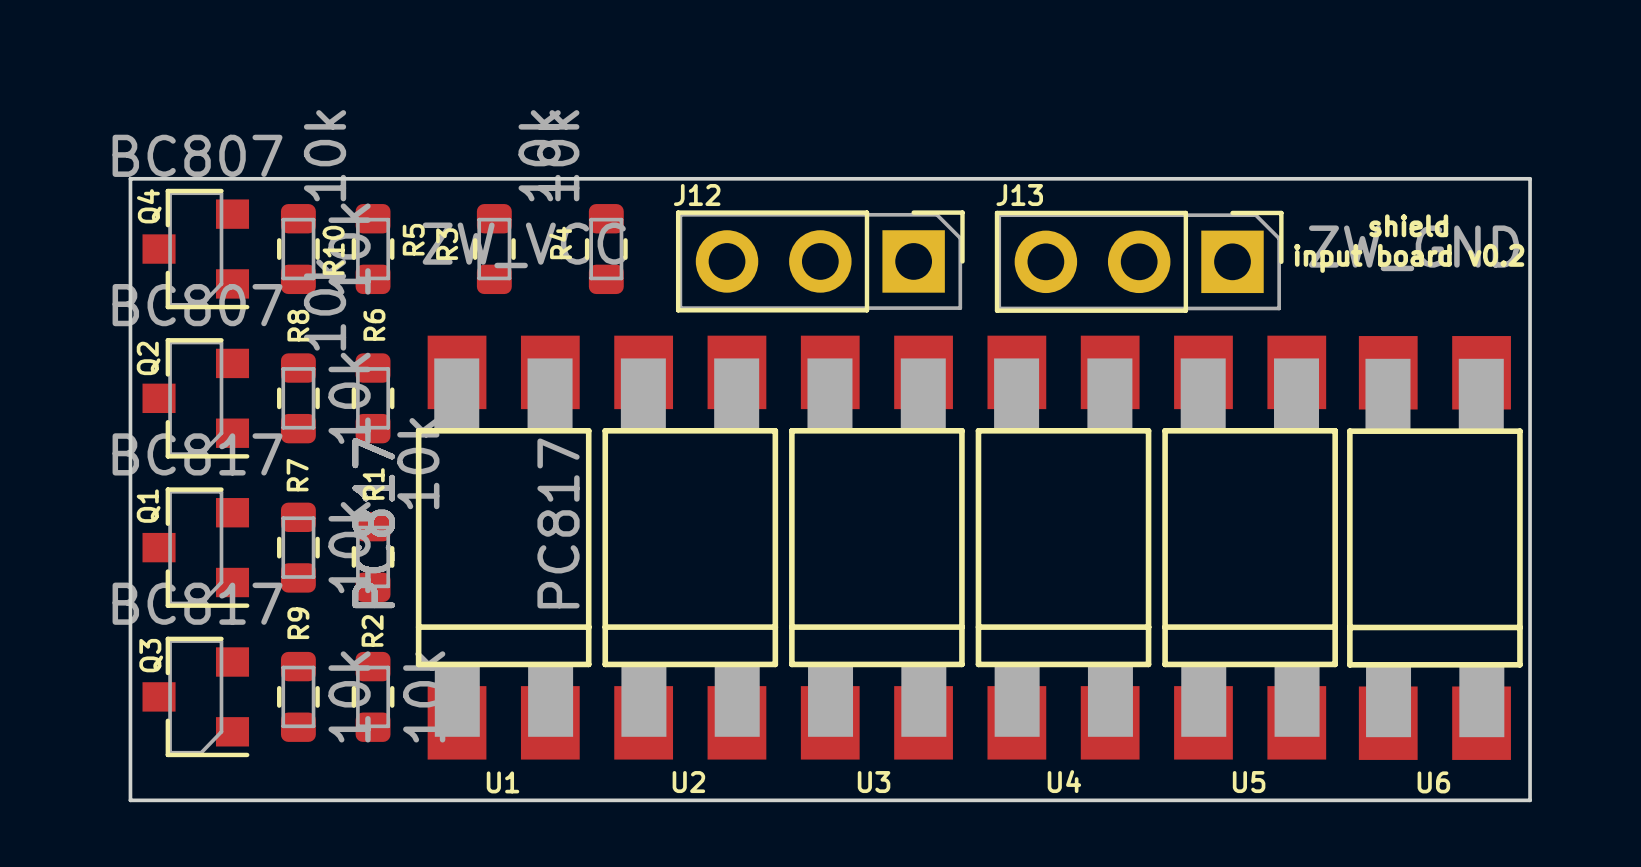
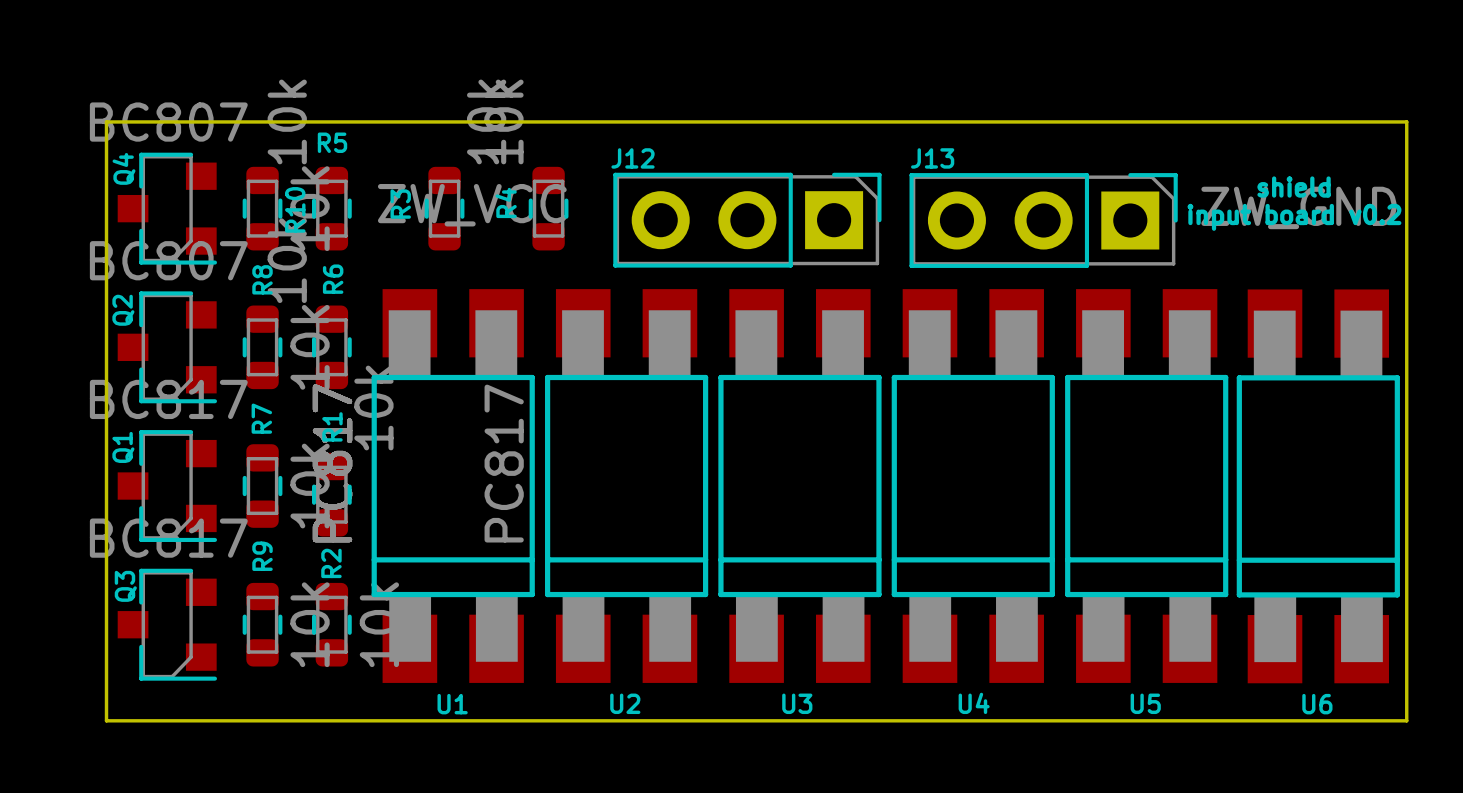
board edge: (130, 178) (1530, 178) -> (106, 143) (106, 121) (1406, 121) (1406, 143)
R5 name rotation: 0° (413, 239) -> 90° clockwise (332, 142)
R5 name position: R5 (413, 239) -> R5 (332, 142)

